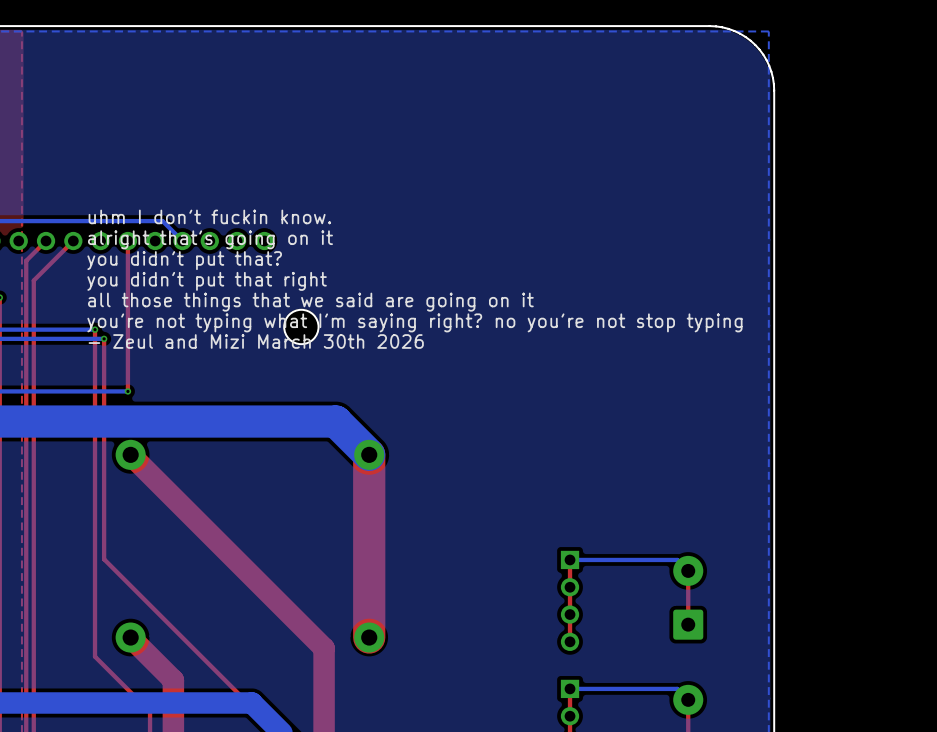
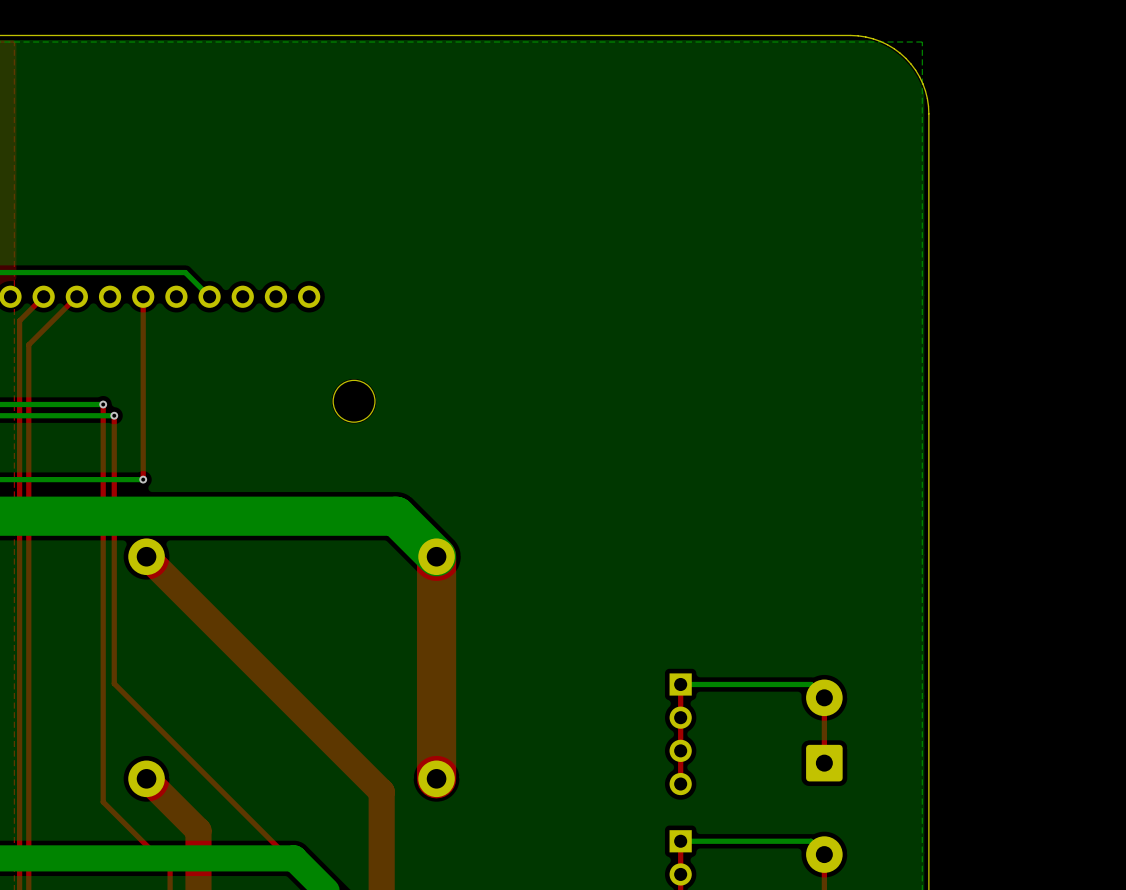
text: uhm I don't fuckin know. (209, 216) -> none
text: alright that's going on it (210, 239) -> none
text: you didn't put that? (184, 260) -> none
text: you didn't put that right (207, 281) -> none
text: all those things that we said are going on it (310, 302) -> none
text: you're not typing what I'm saying right? no you're not stop typing (414, 322) -> none
text: - Zeul and Mizi March 30th 2026 (256, 341) -> none

